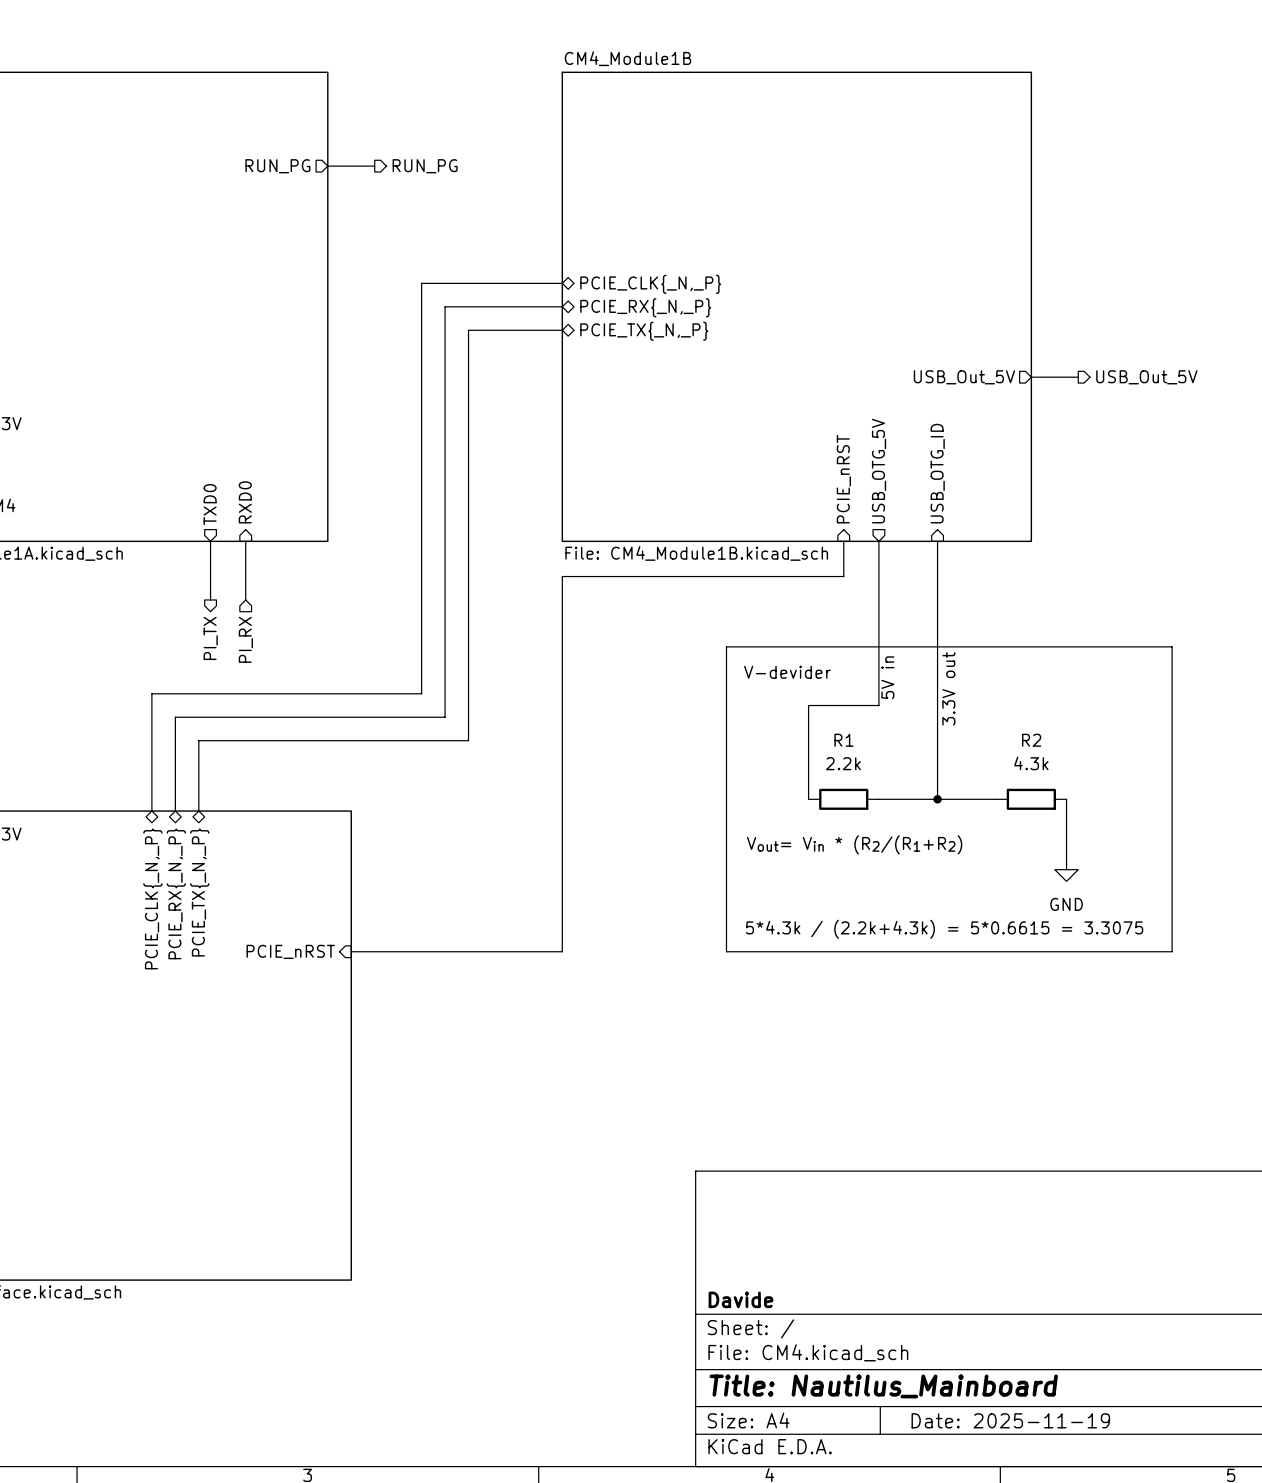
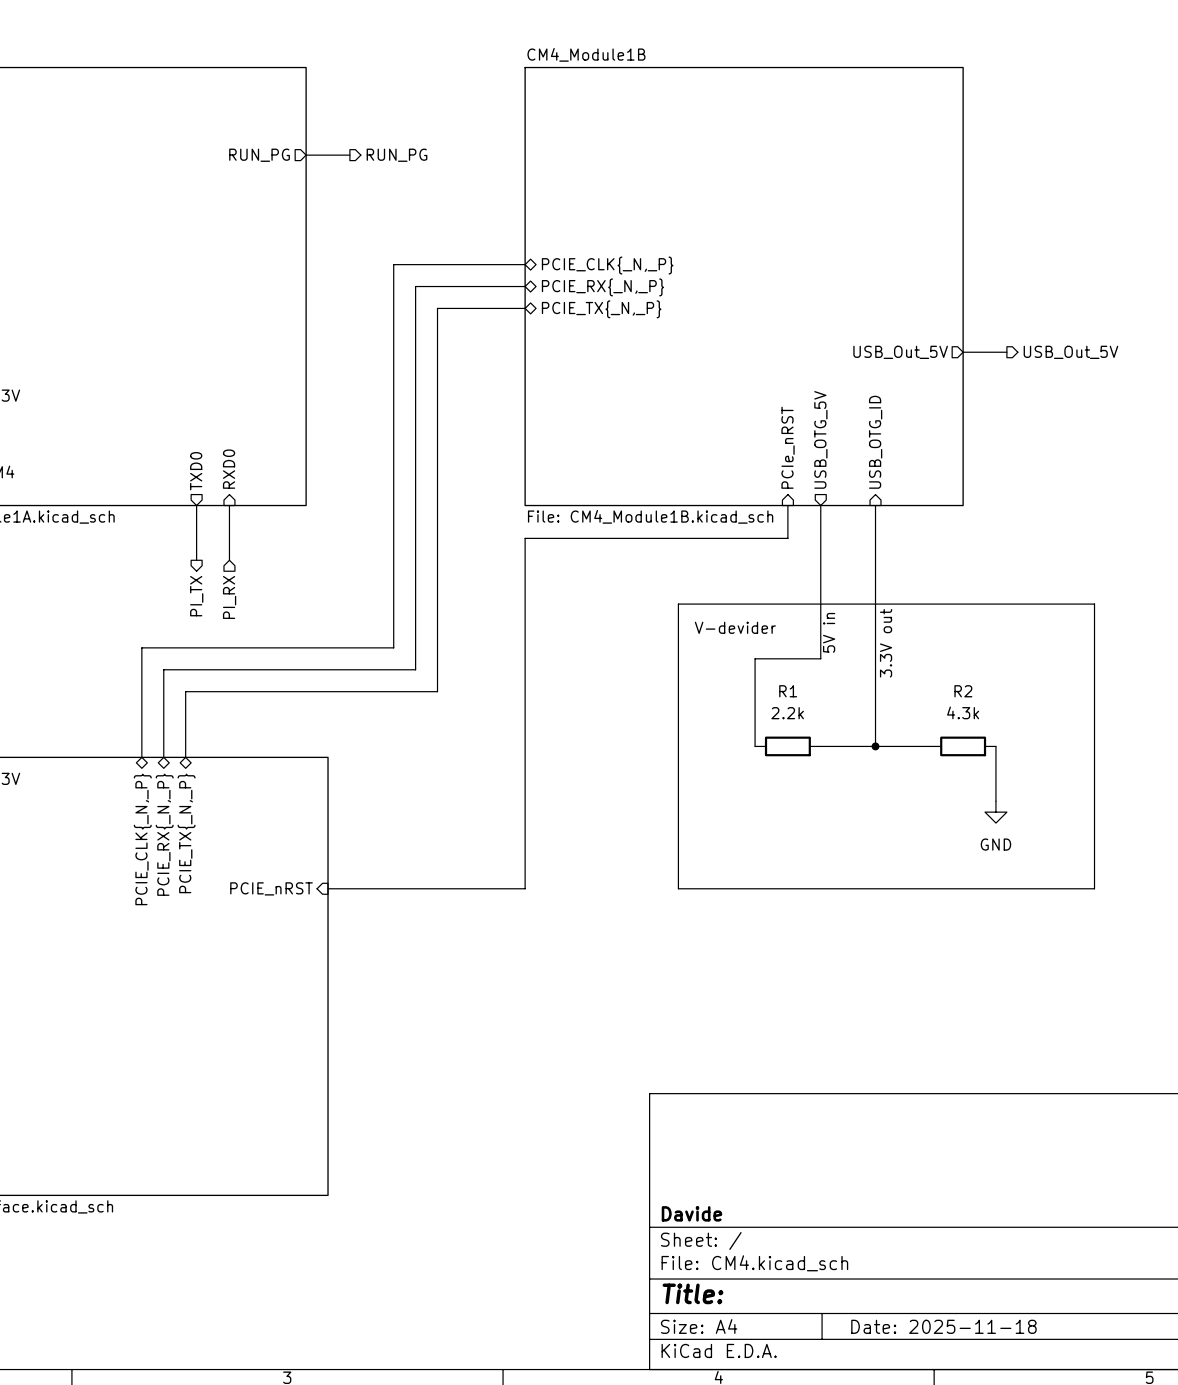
sheet pin: PCIE_nRST (843, 479) -> PCIe_nRST (788, 447)
text: Vout= Vin * (R2/(R1+R2) (854, 844) -> none
text: 5*4.3k / (2.2k+4.3k) = 5*0.6615 = 3.3075 (944, 929) -> none
title block: Title: Nautilus_Mainboard (883, 1386) -> Title: (692, 1293)
title block: Date: 2025-11-19 (1010, 1420) -> Date: 2025-11-18 (943, 1326)

